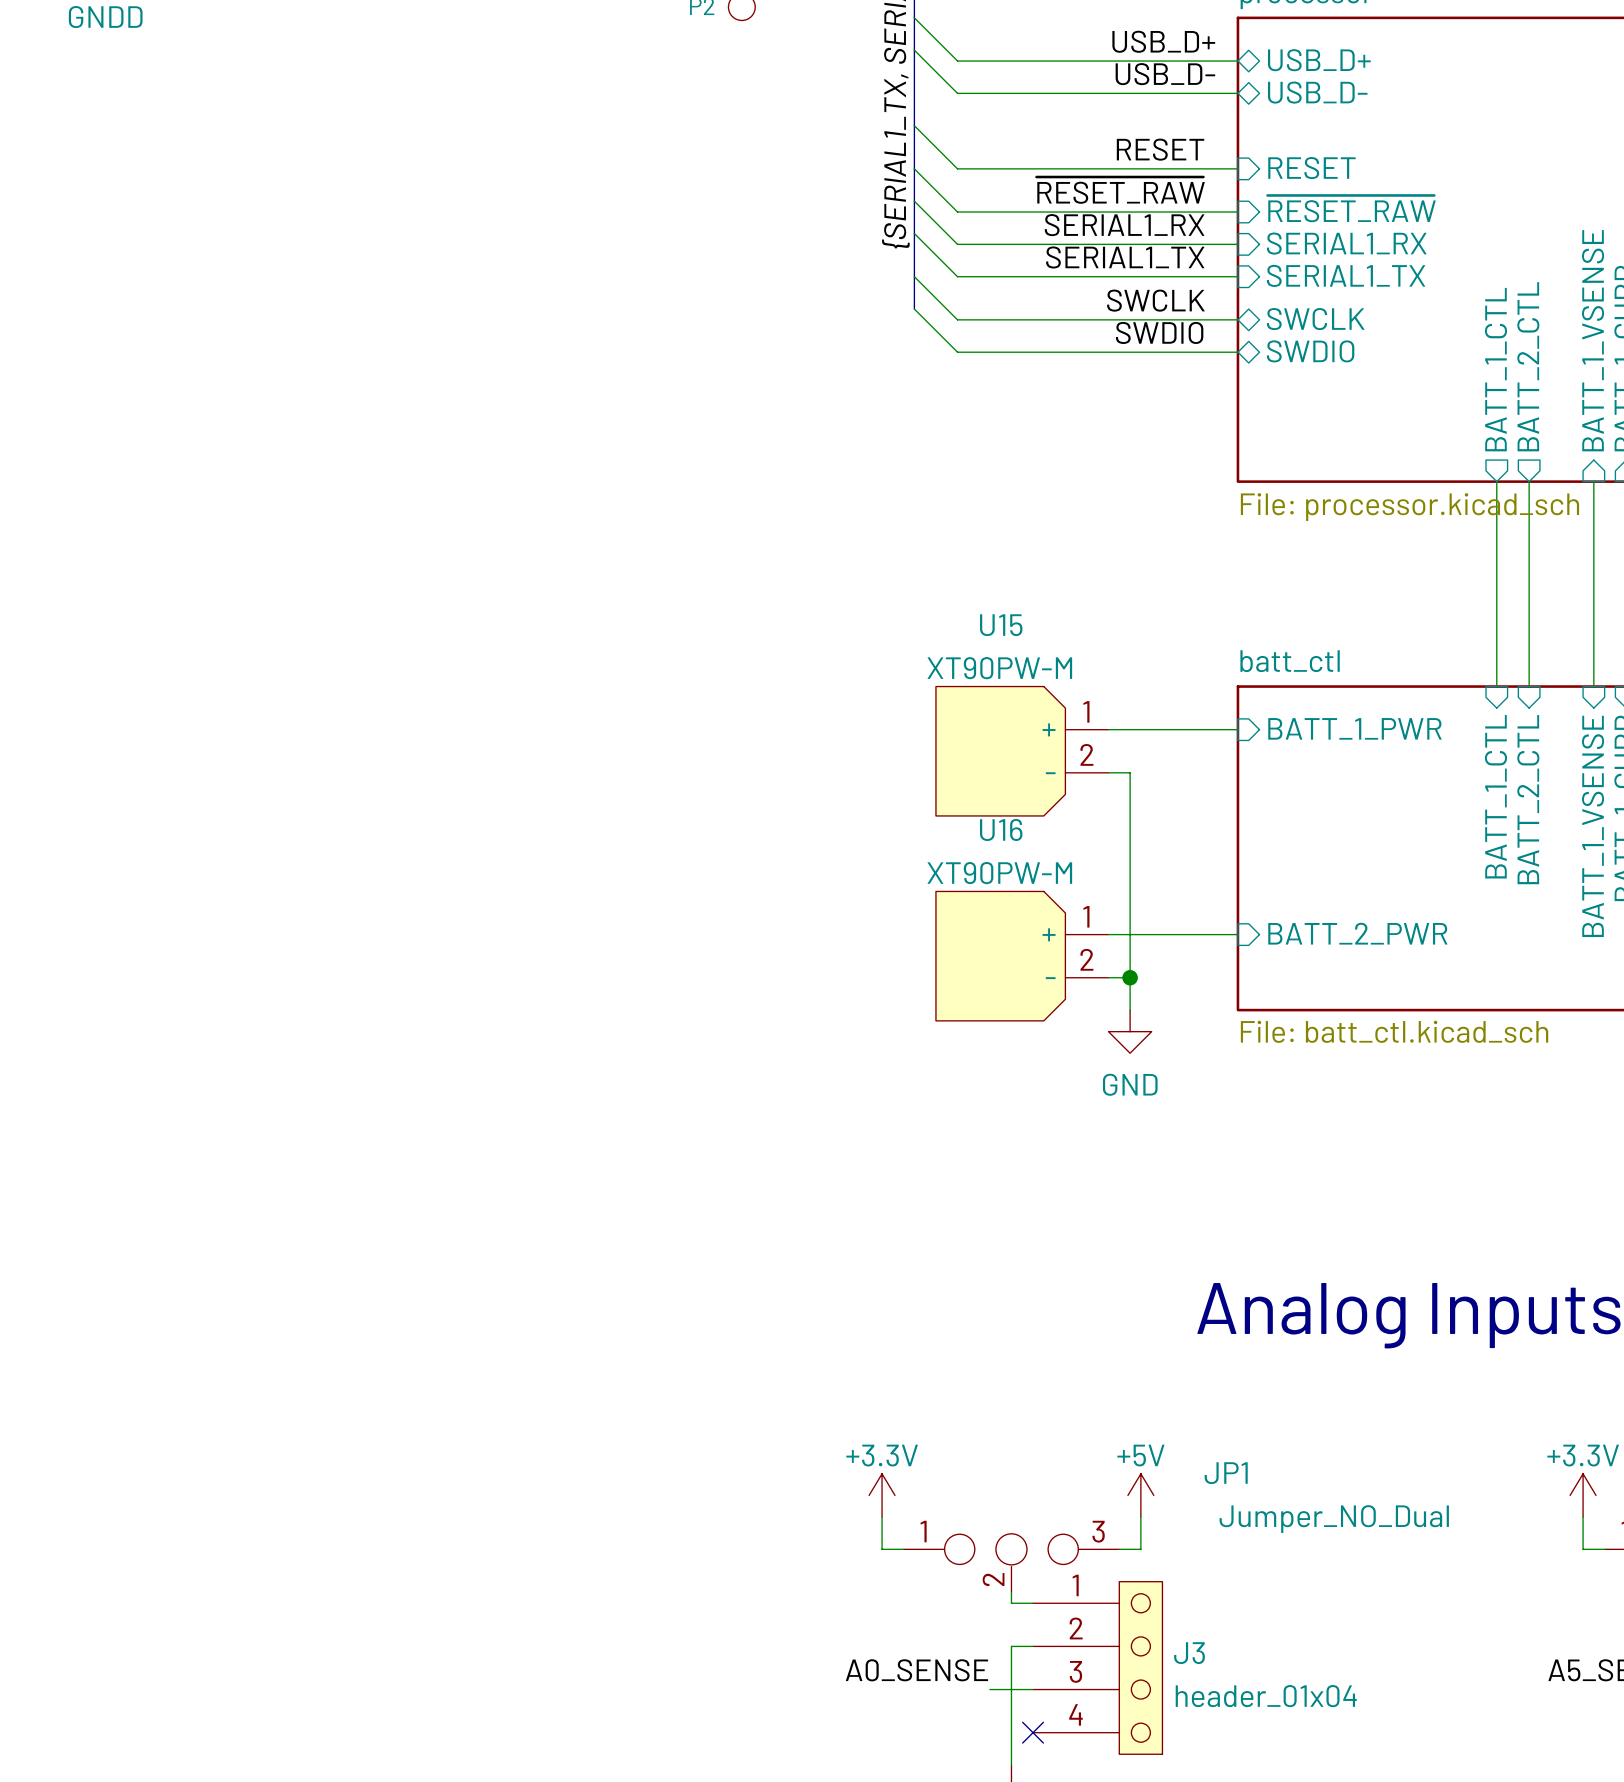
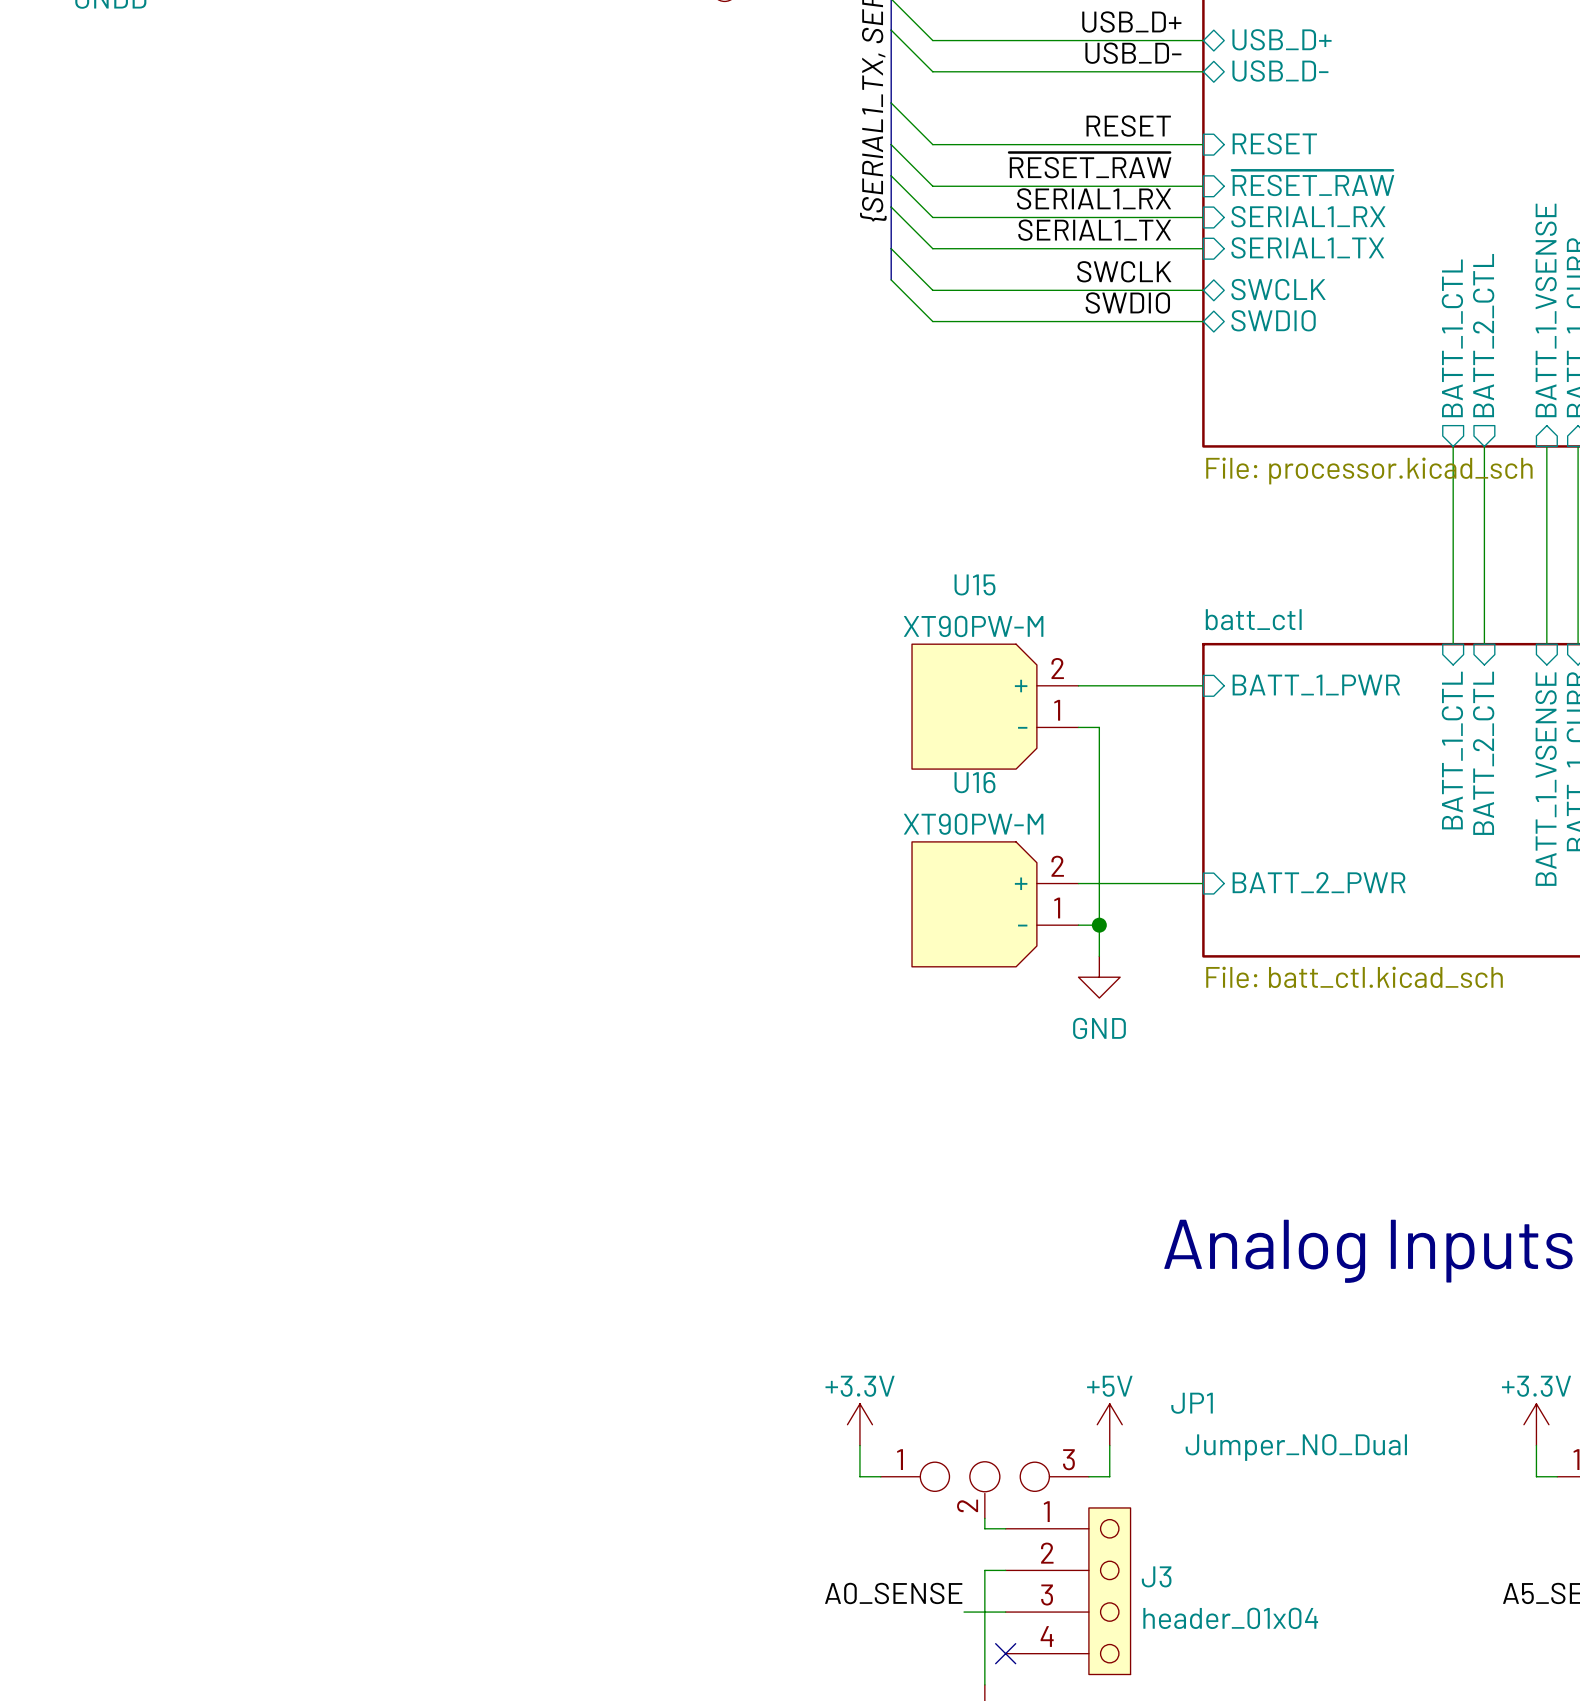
U15 pin number: 1 (1086, 711) -> 2 (1057, 668)
U15 pin number: 2 (1086, 754) -> 1 (1057, 710)
U16 pin number: 1 (1086, 916) -> 2 (1057, 866)
U16 pin number: 2 (1086, 959) -> 1 (1057, 908)

